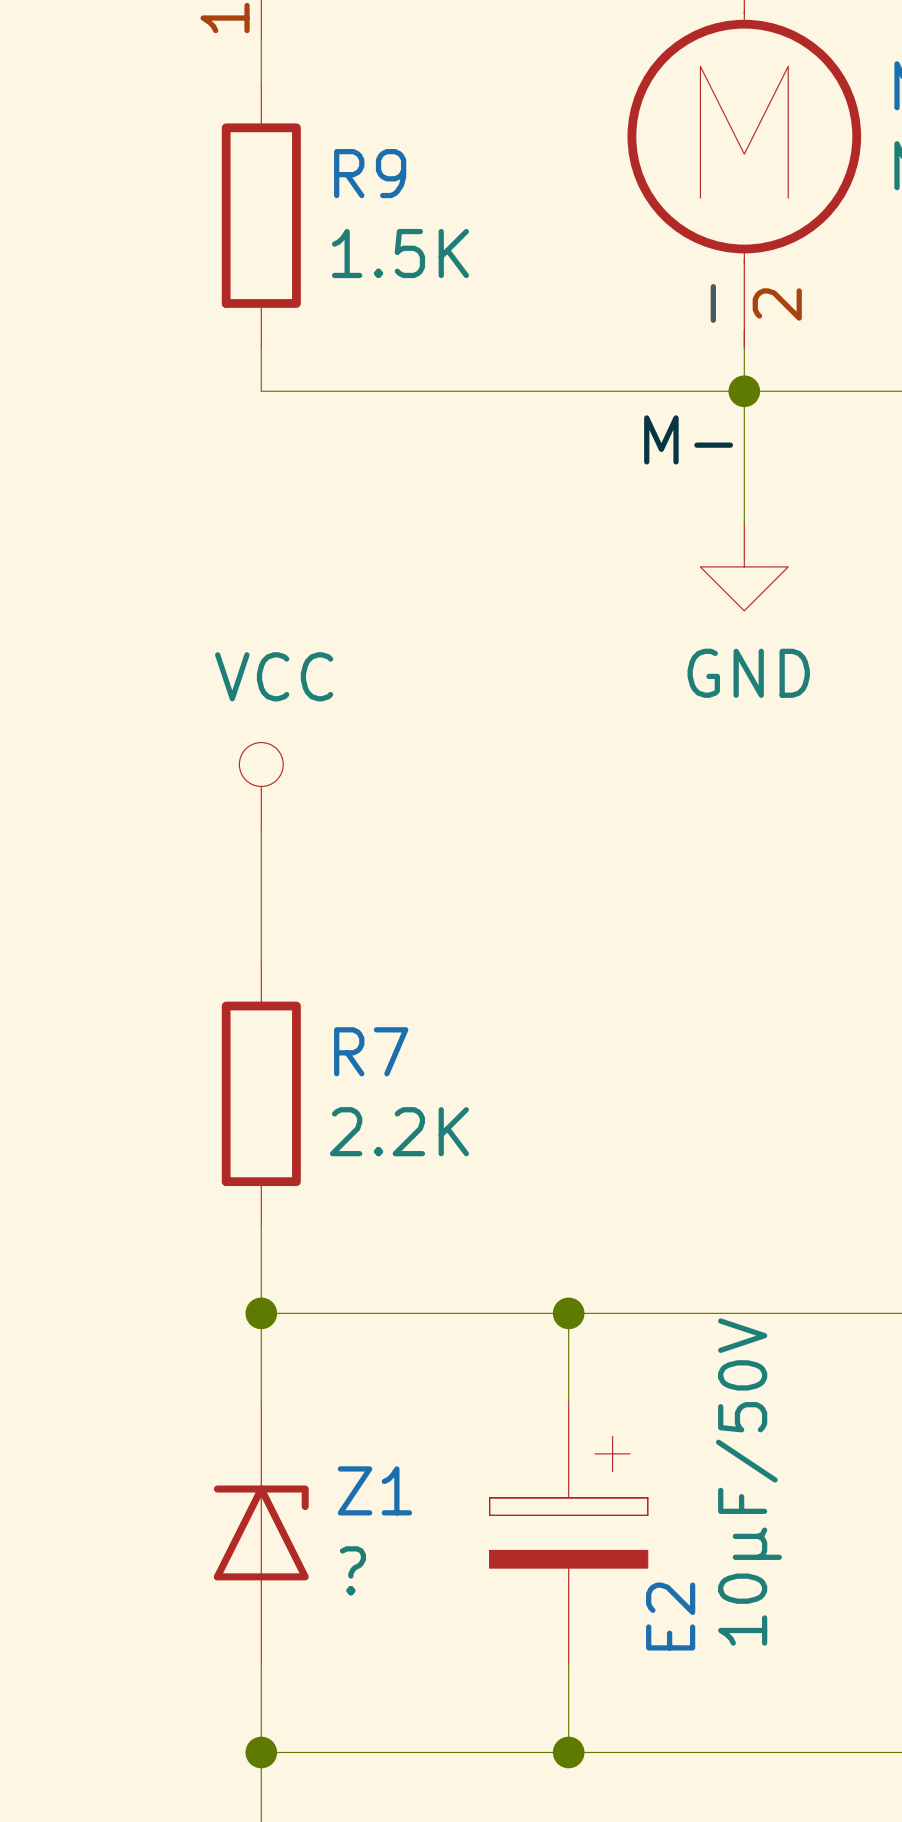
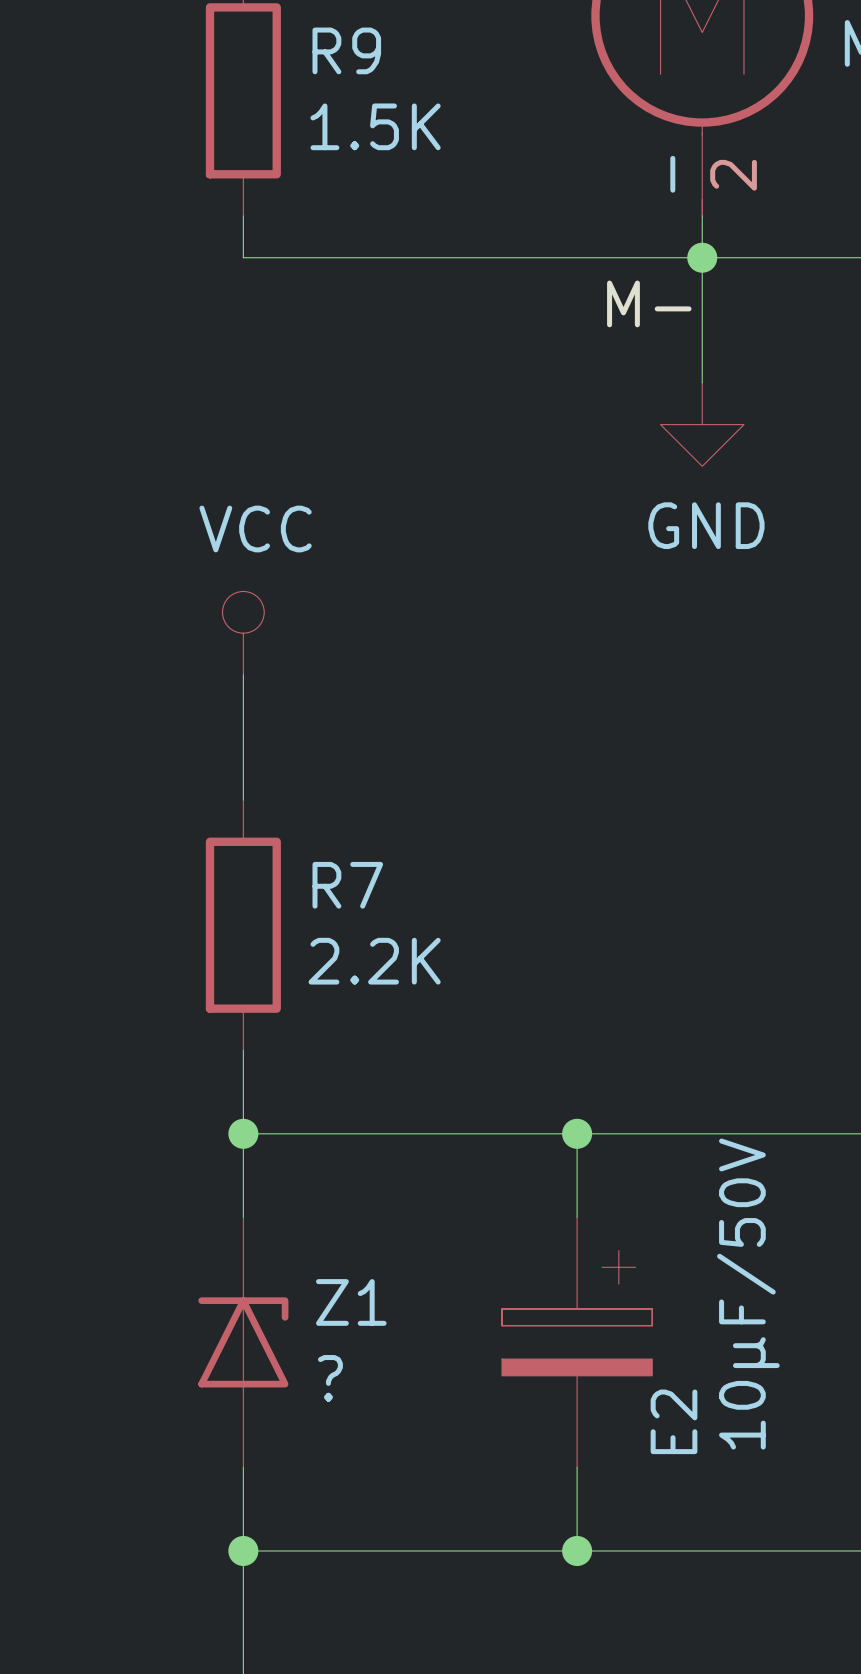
wire: (568, 1313) (568, 1401) -> (577, 1133) (577, 1217)
junction position: (568, 1313) -> (577, 1133)
E2 position: (568, 1532) -> (577, 1342)
wire: (568, 1664) (568, 1752) -> (577, 1467) (577, 1550)
junction position: (568, 1752) -> (577, 1550)

